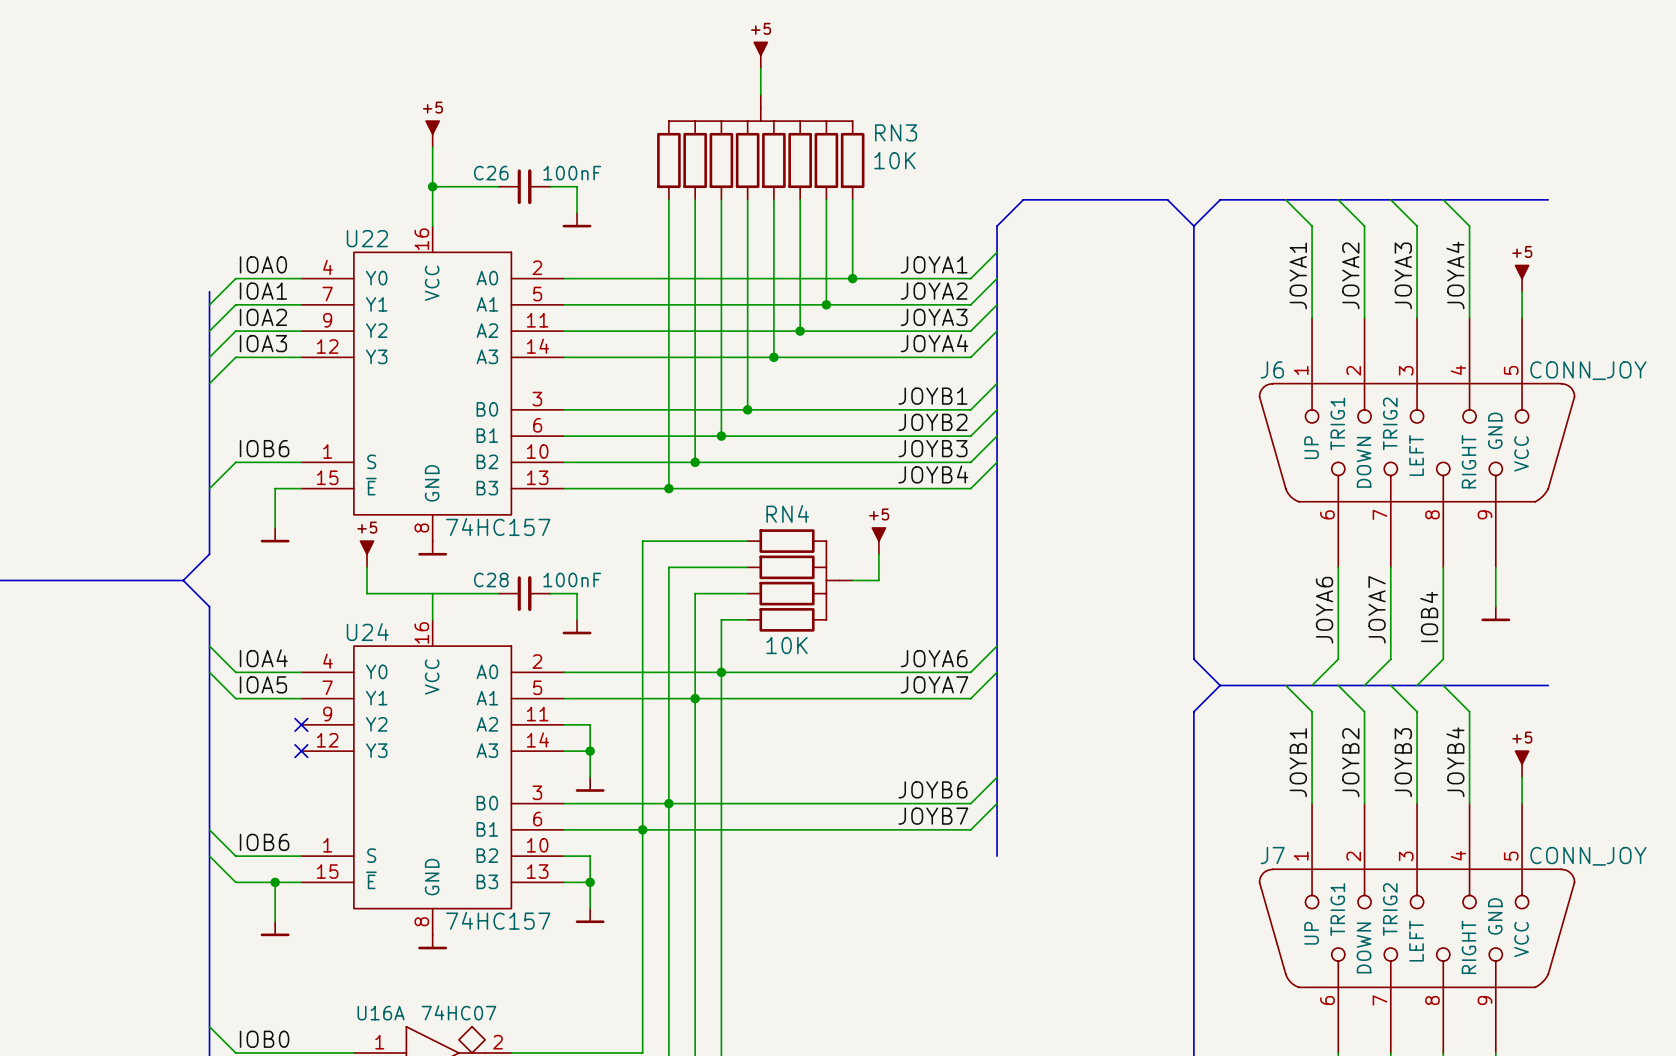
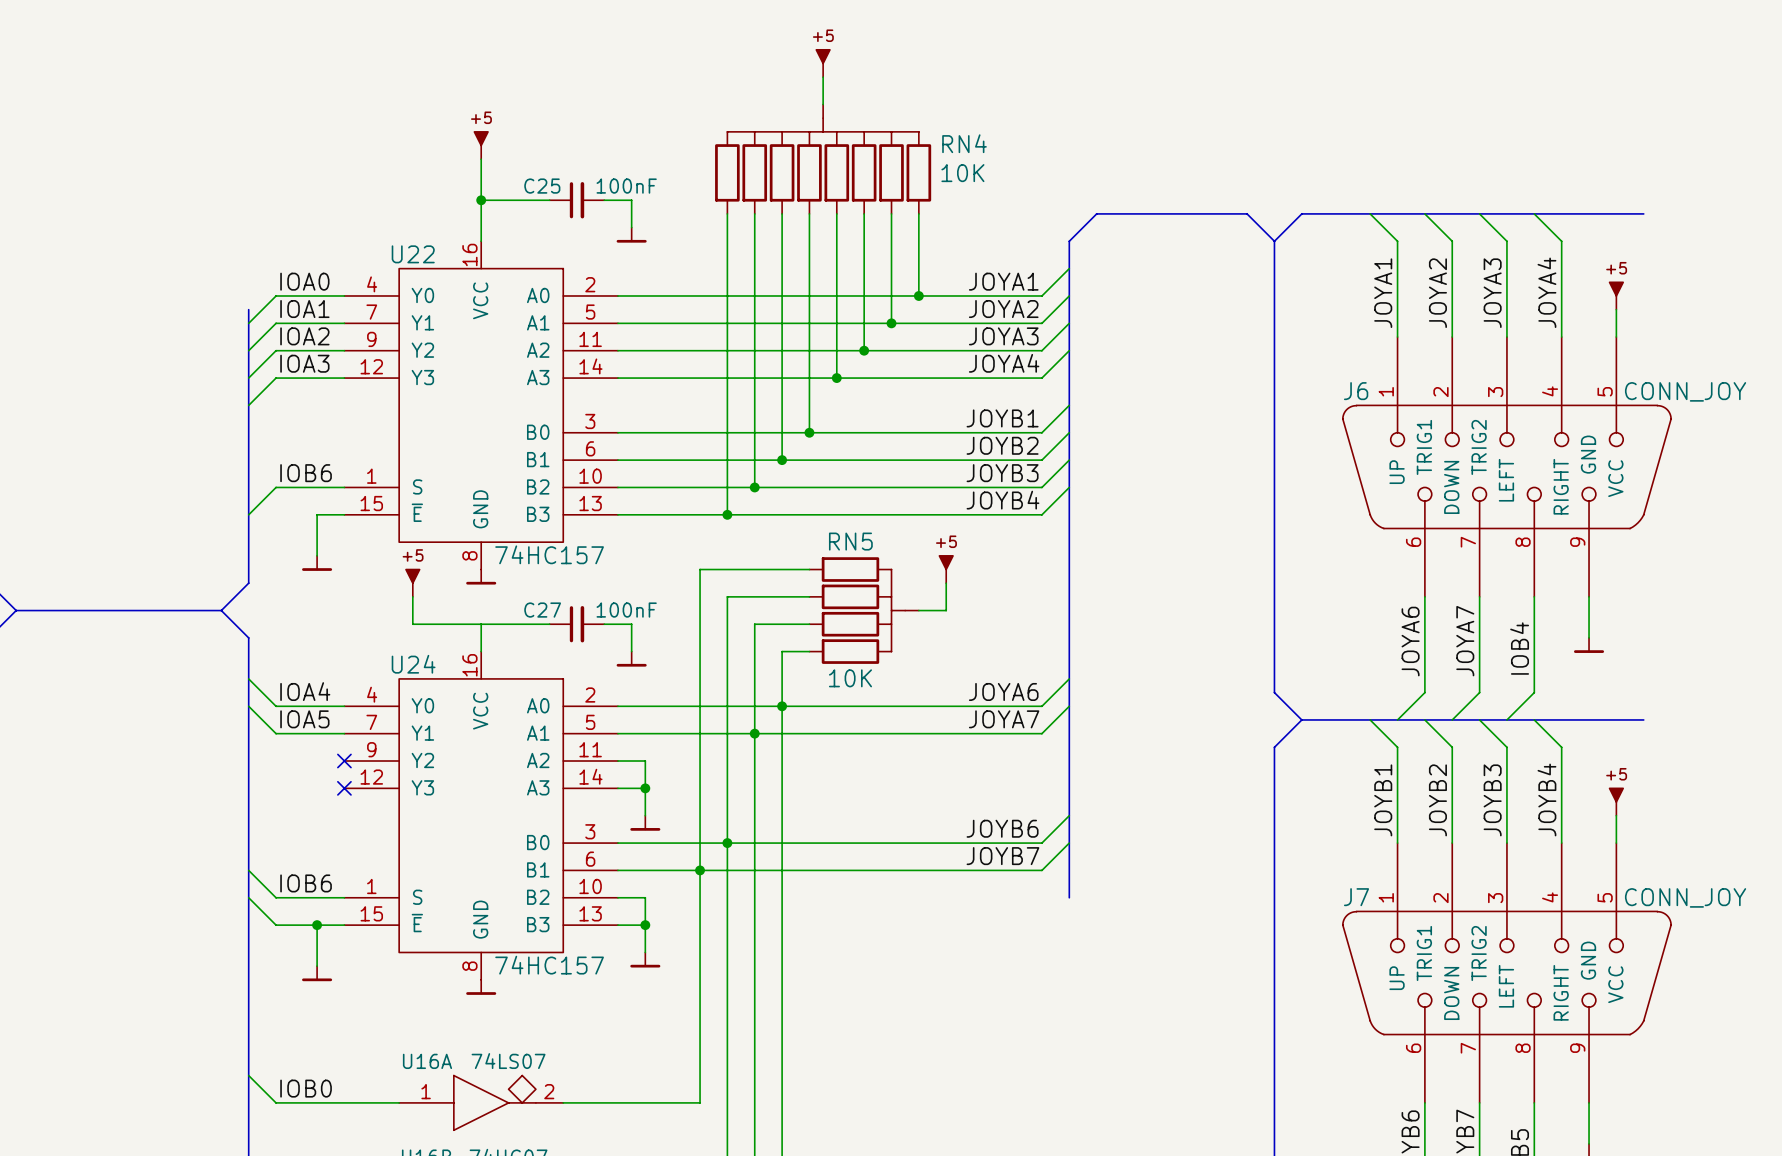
RN3 name: RN3 (896, 132) -> RN4 (964, 143)
C26 name: C26 (491, 173) -> C25 (542, 186)
RN4 name: RN4 (787, 513) -> RN5 (850, 541)
C28 name: C28 (491, 580) -> C27 (542, 610)
U16A value: 74HC07 (458, 1012) -> 74LS07 (508, 1061)

